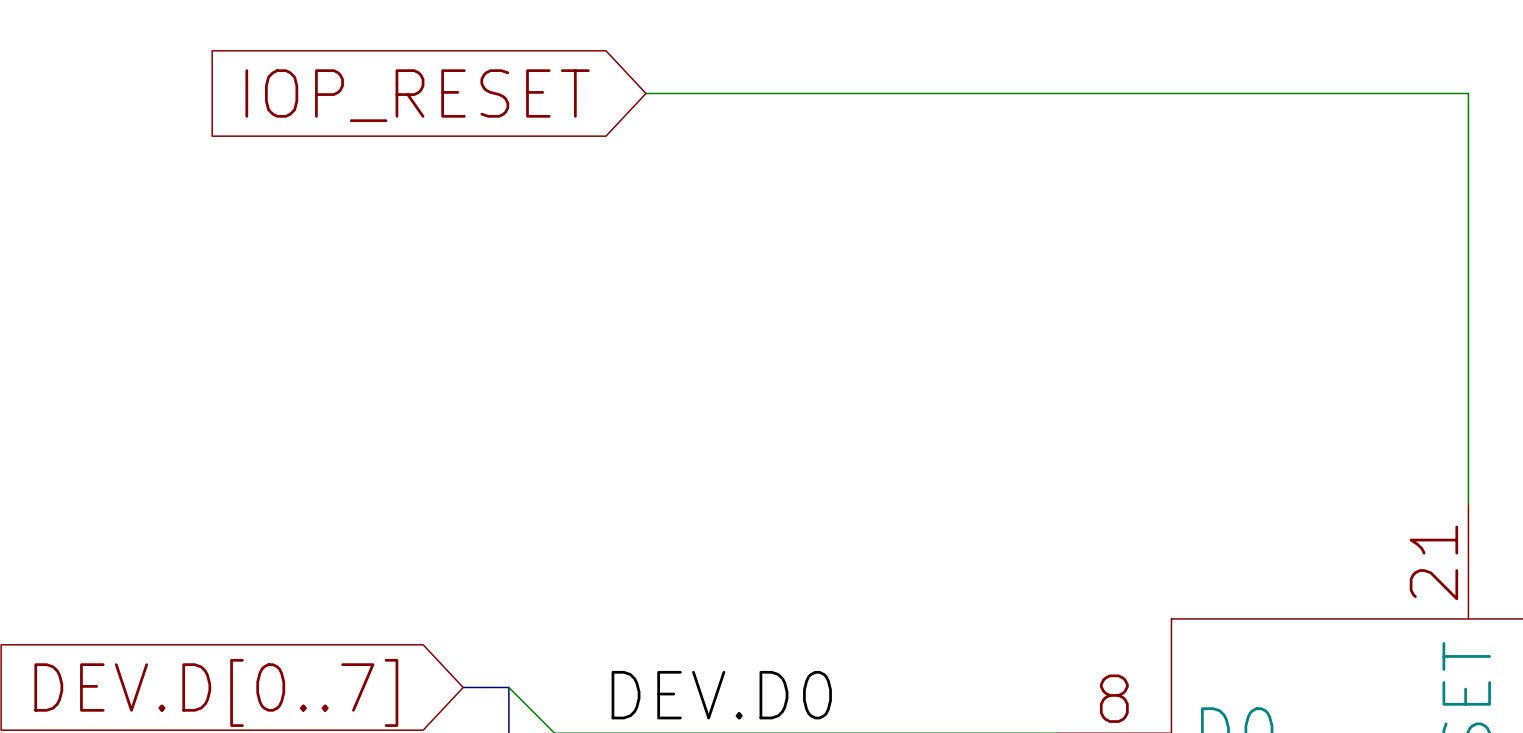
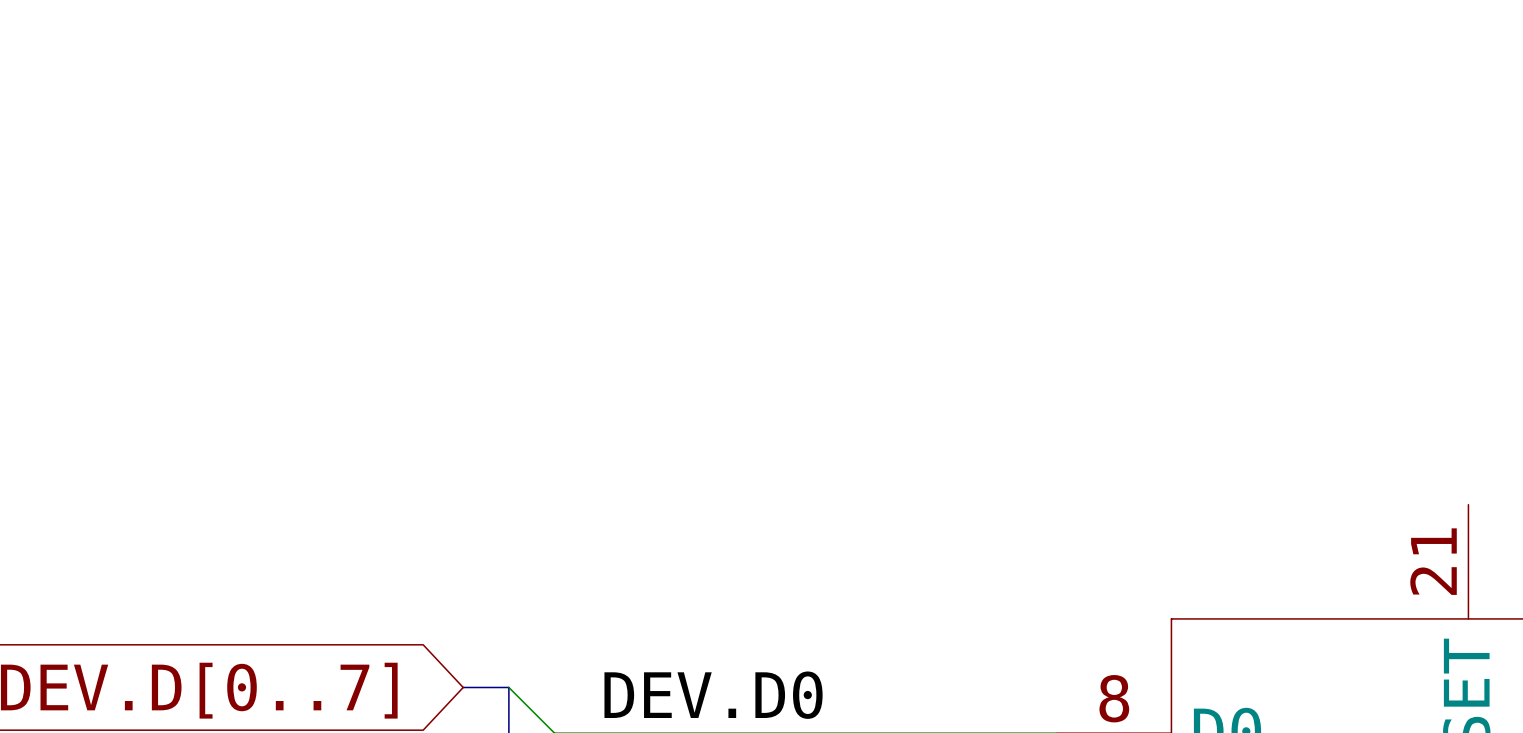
wire: (645, 93) (1468, 93) (1468, 504) -> none
global label: IOP_RESET (417, 95) -> none

